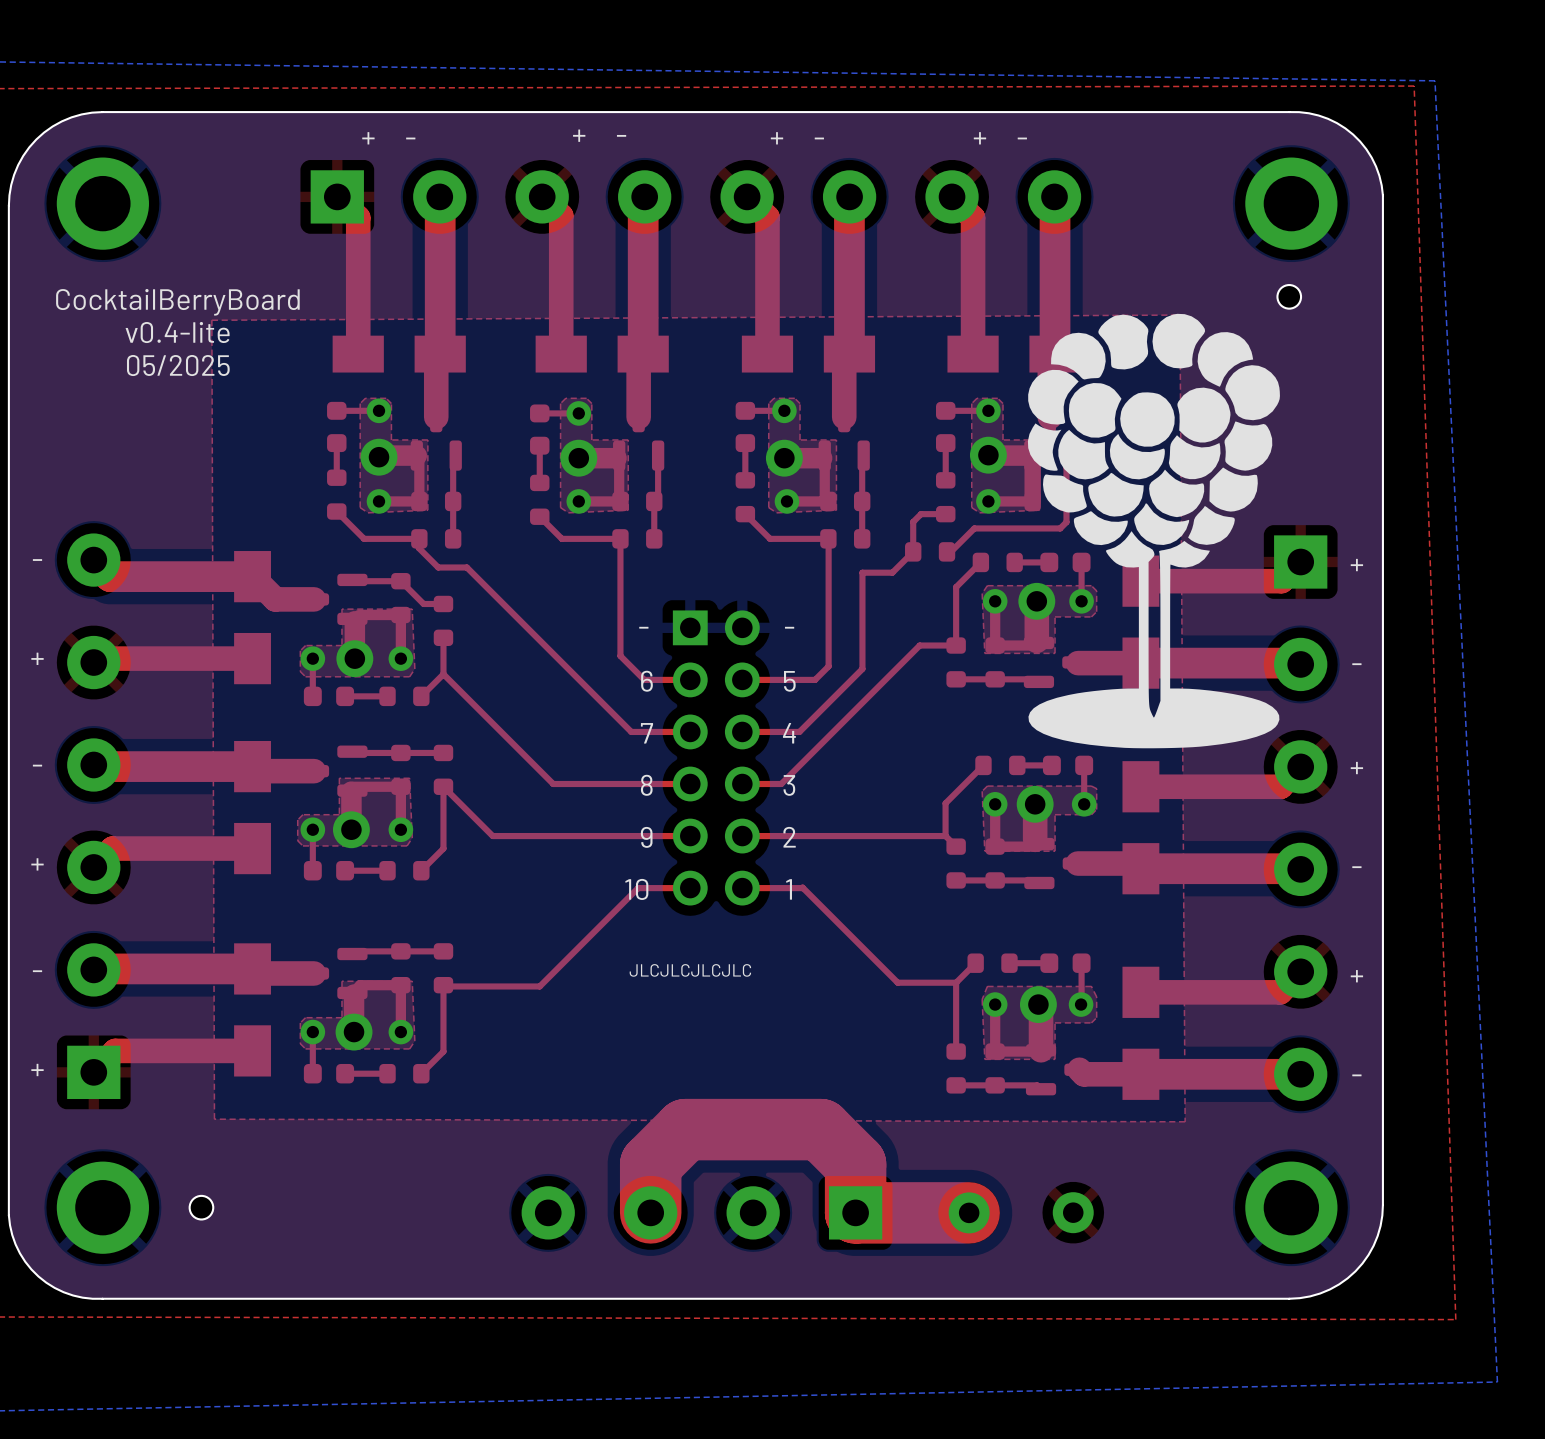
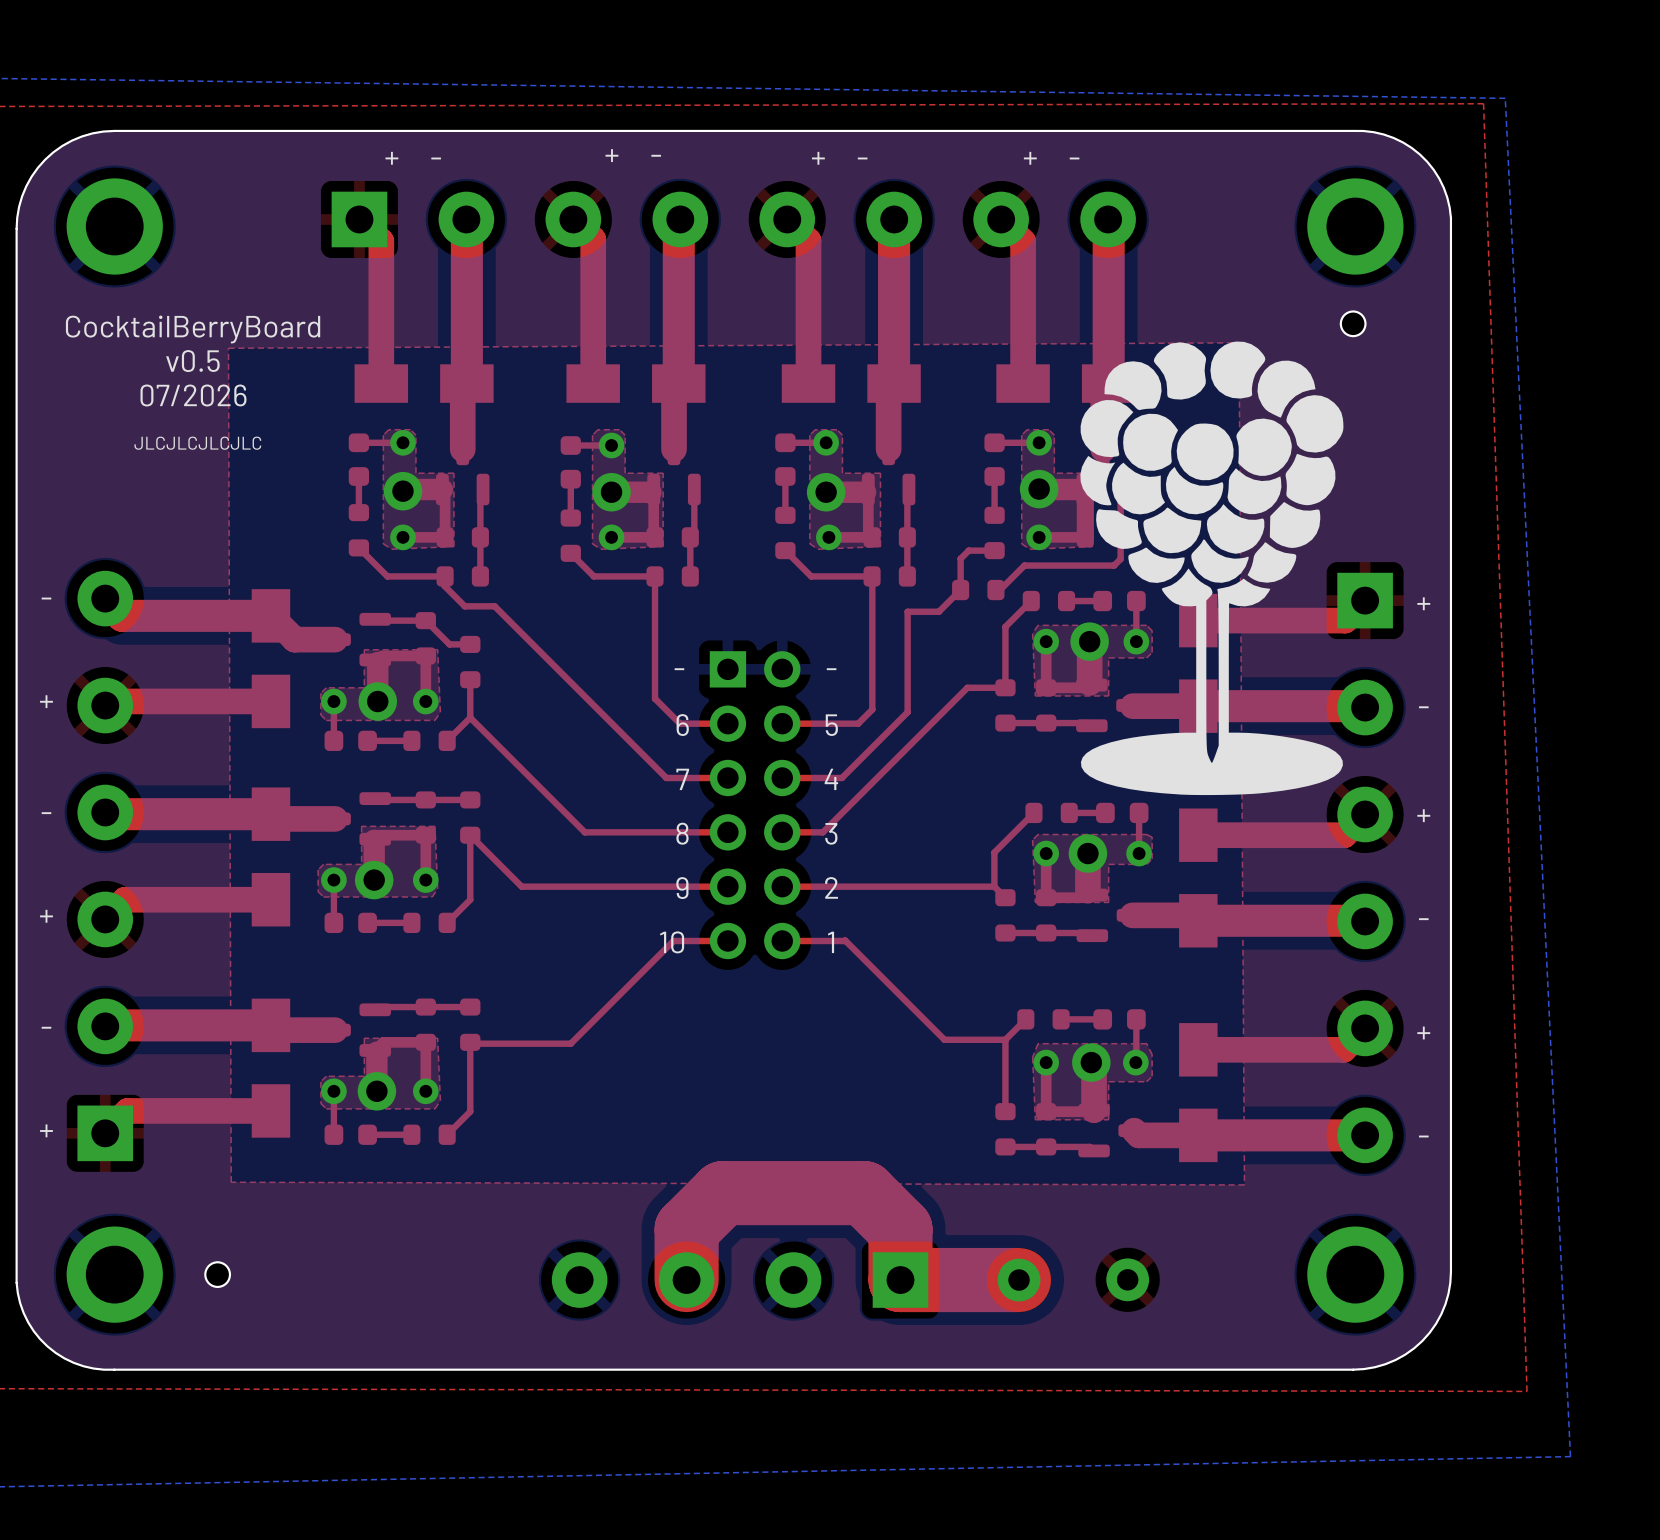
text: v0.4-lite (177, 332) -> v0.5 (192, 361)
text: 05/2025 (178, 365) -> 07/2026 (193, 395)
text: none -> JLCJLCJLCJLC (197, 443)
text: JLCJLCJLCJLC (690, 970) -> none

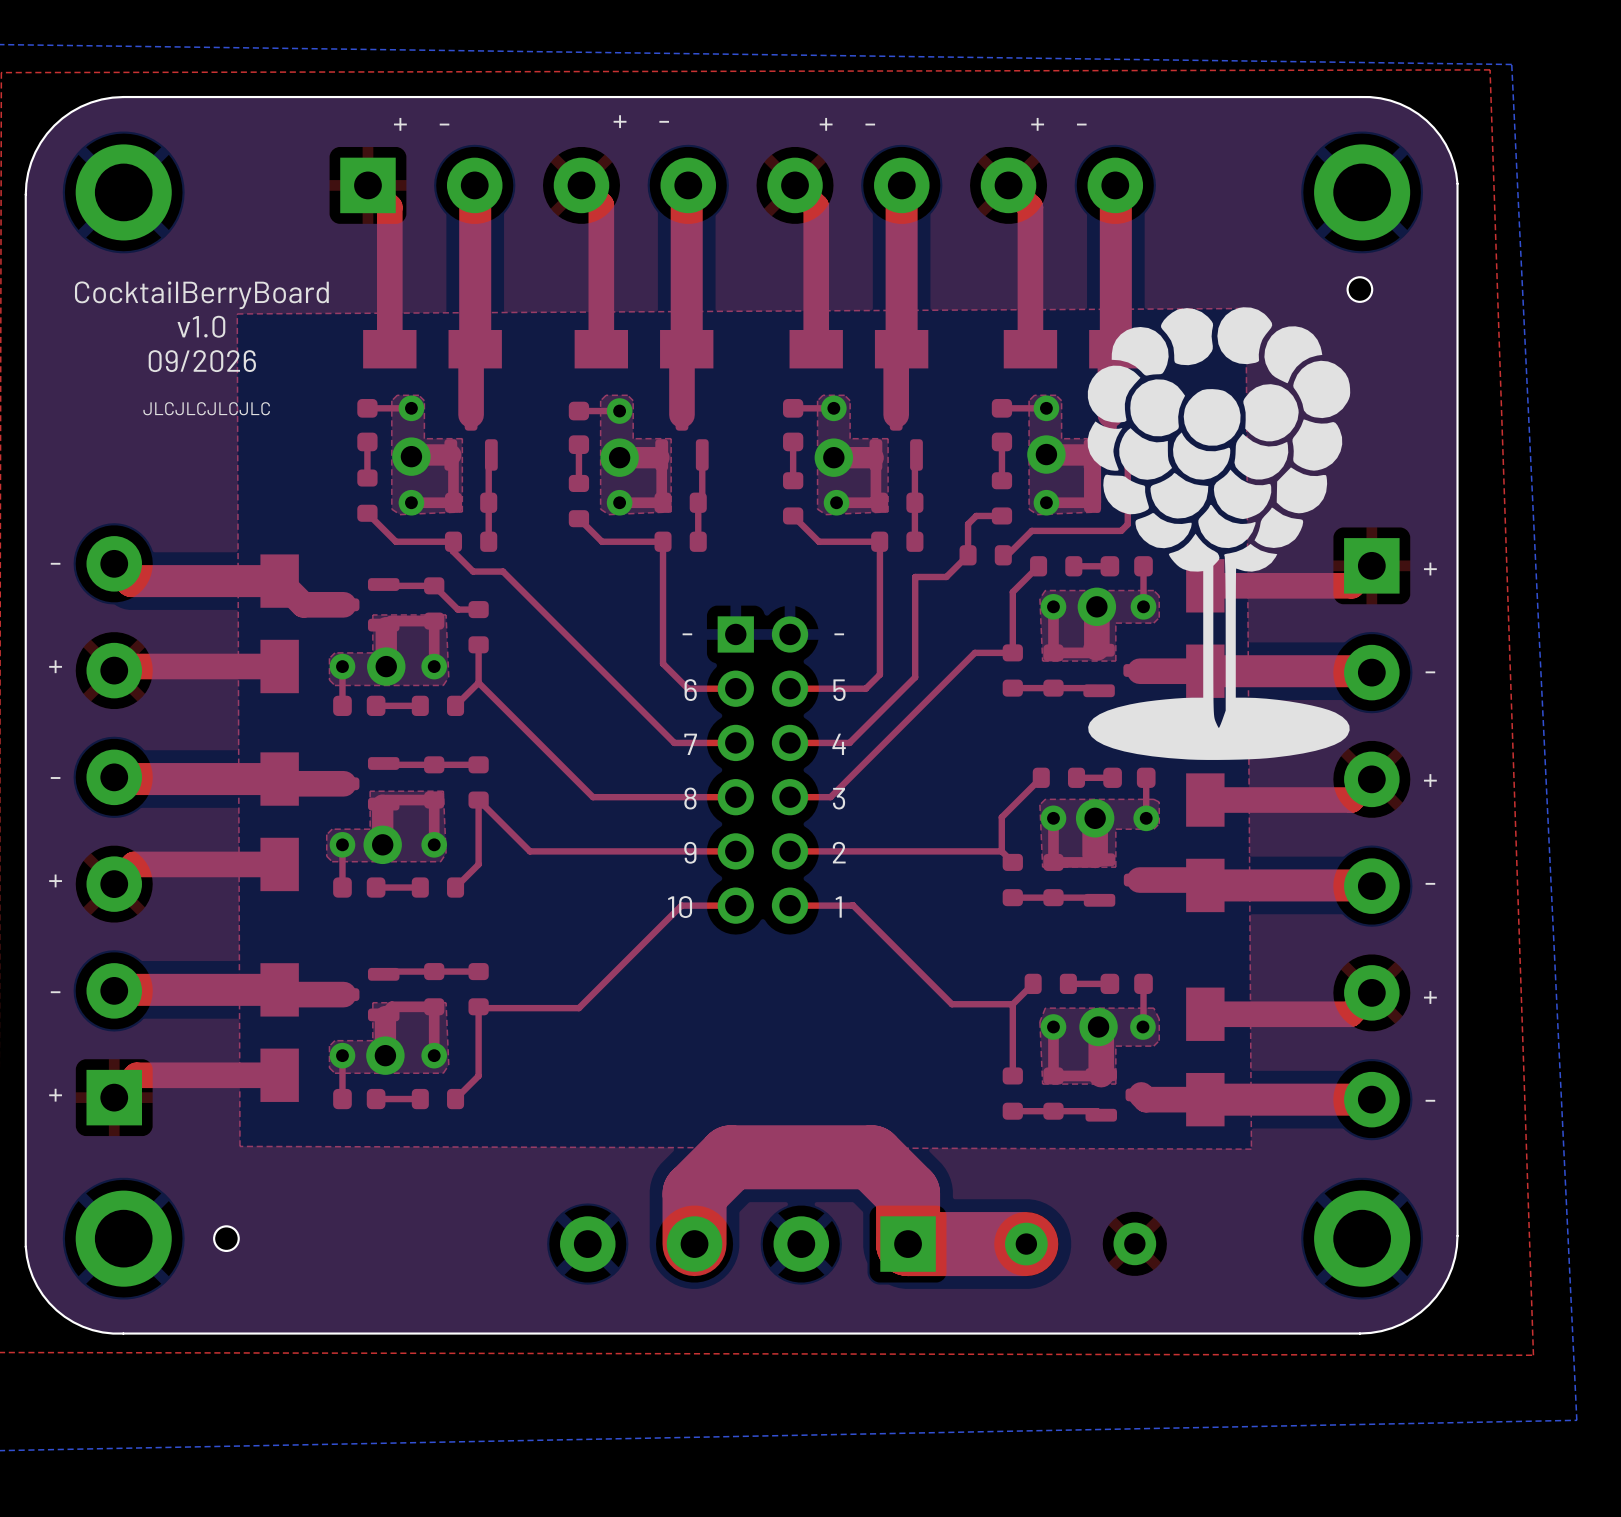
text: v0.5 (192, 361) -> v1.0 (201, 326)
text: 07/2026 (193, 395) -> 09/2026 (202, 361)

